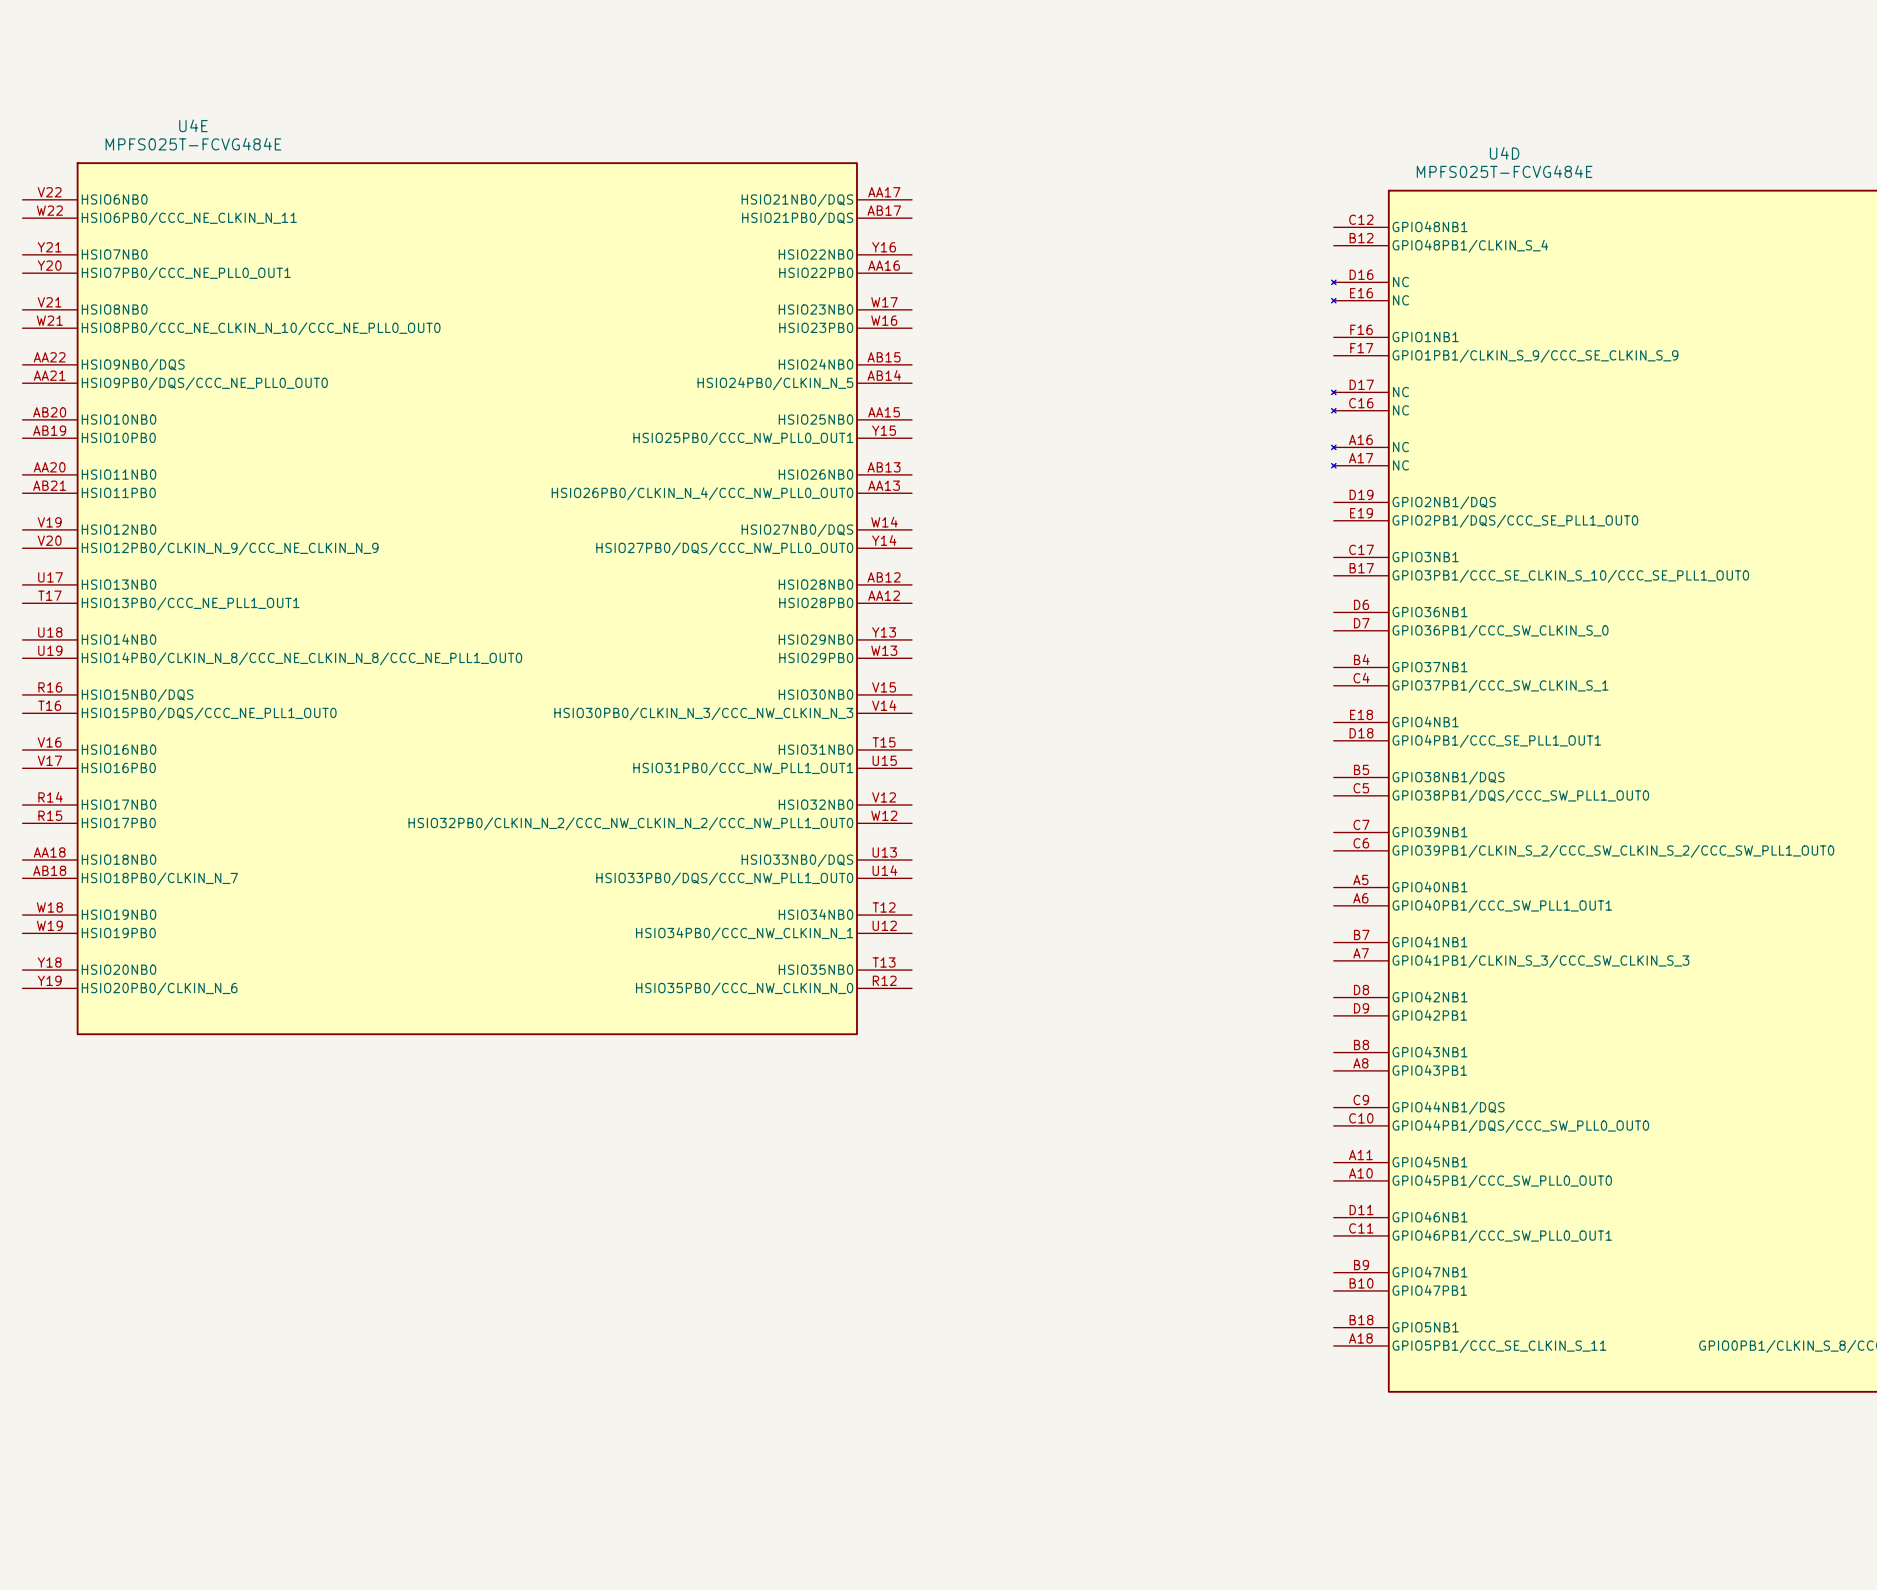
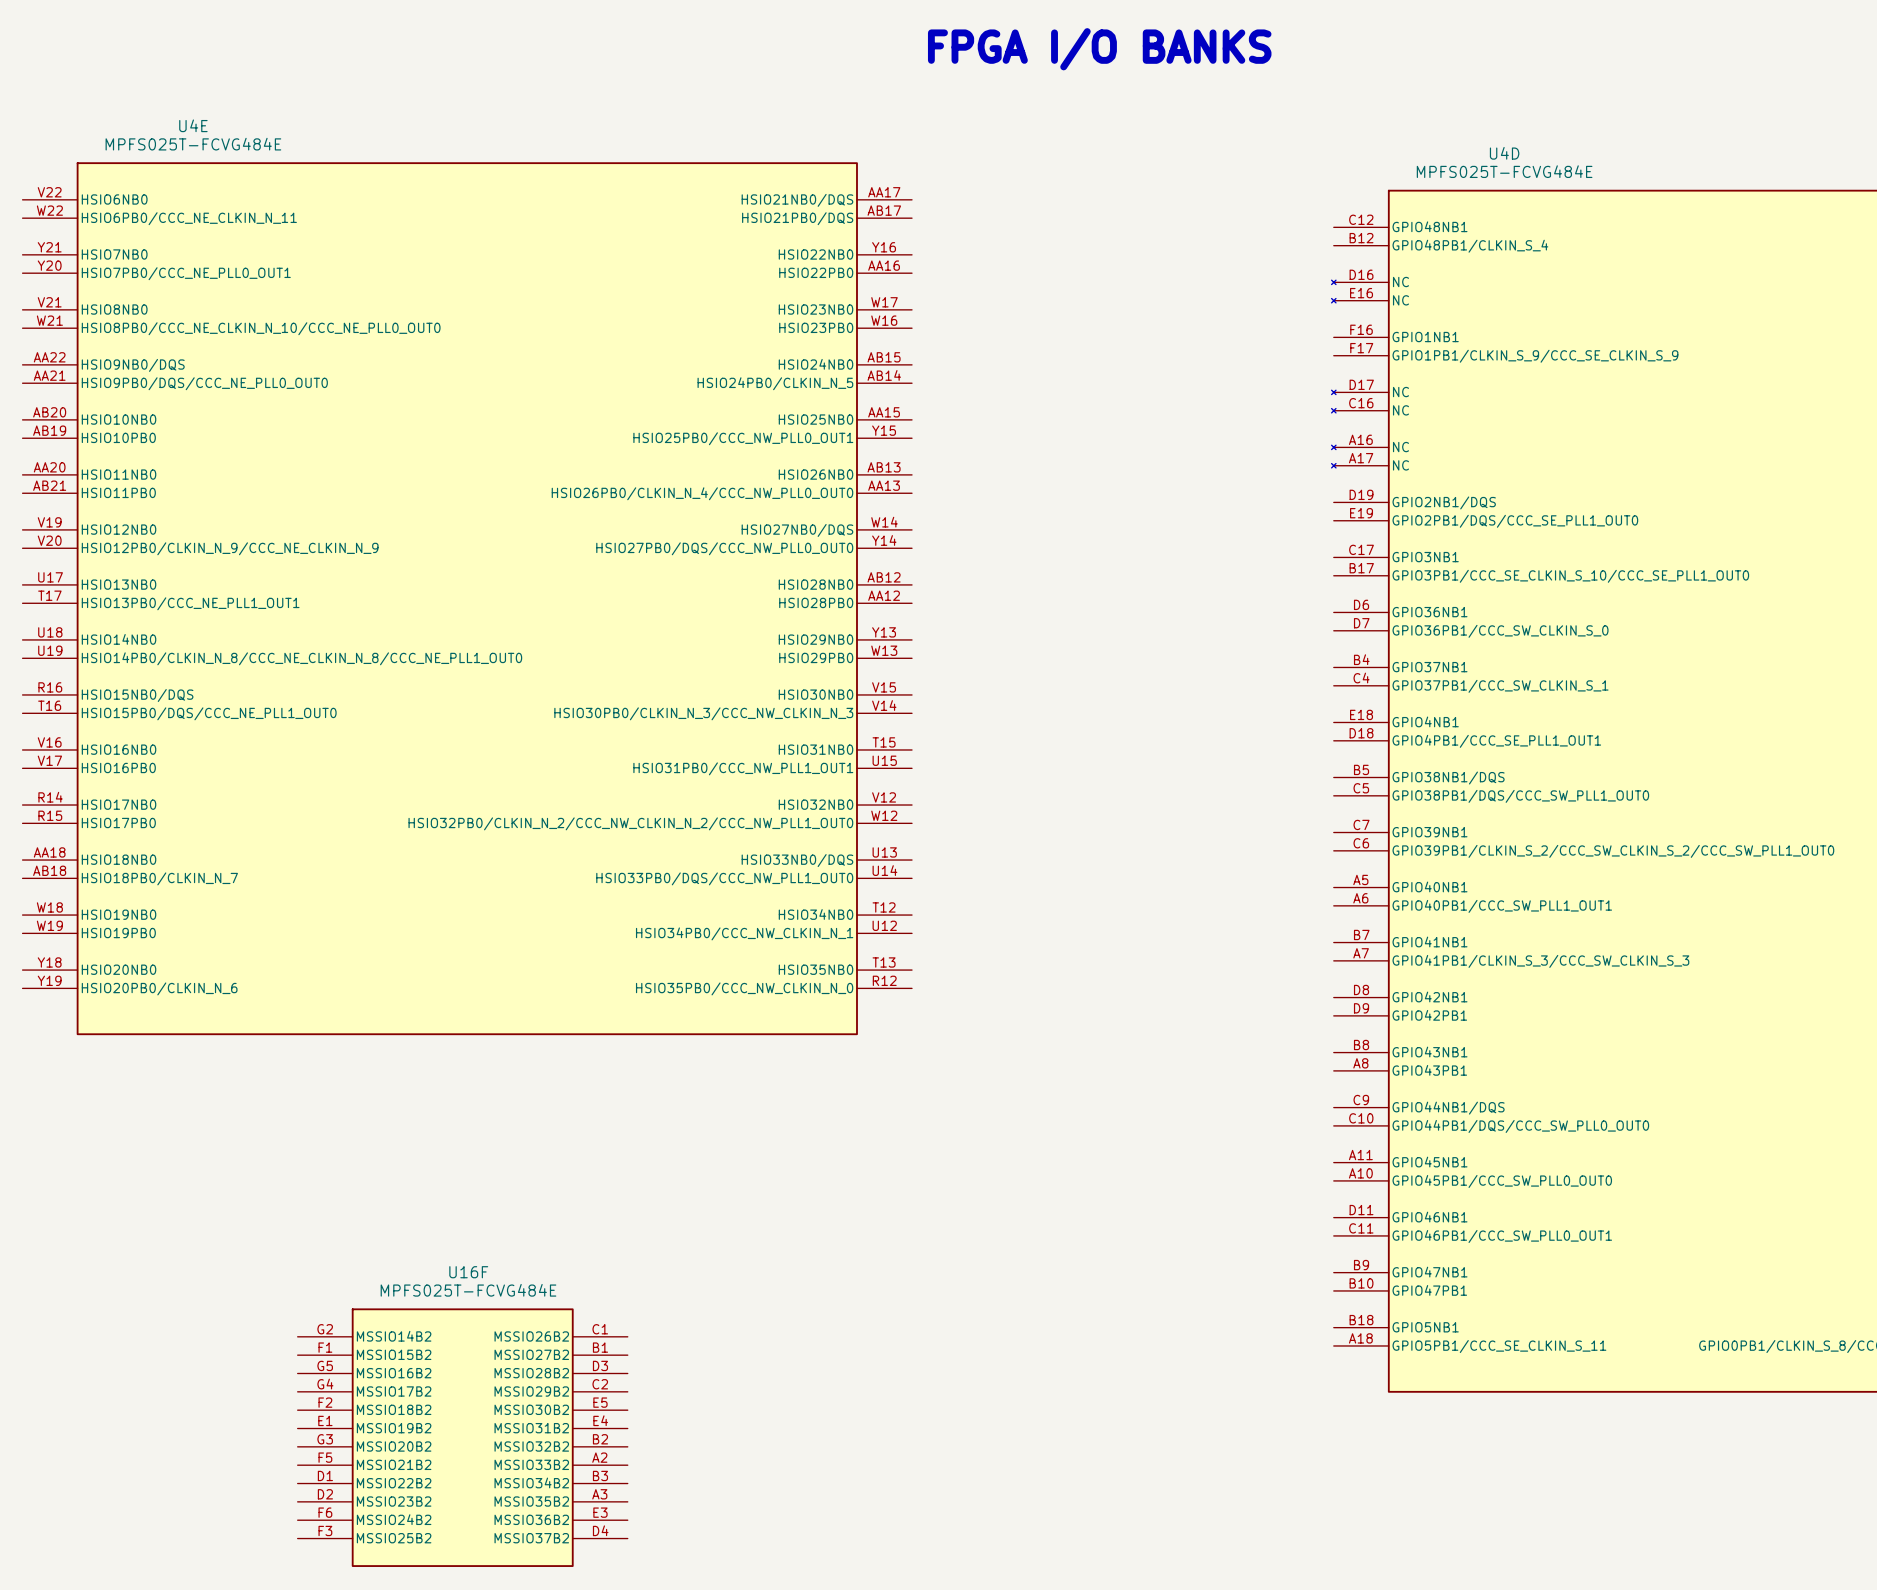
text: none -> FPGA I/O BANKS (1099, 49)
U16F: none -> MPFS025T-FCVG484E (462, 1437)

